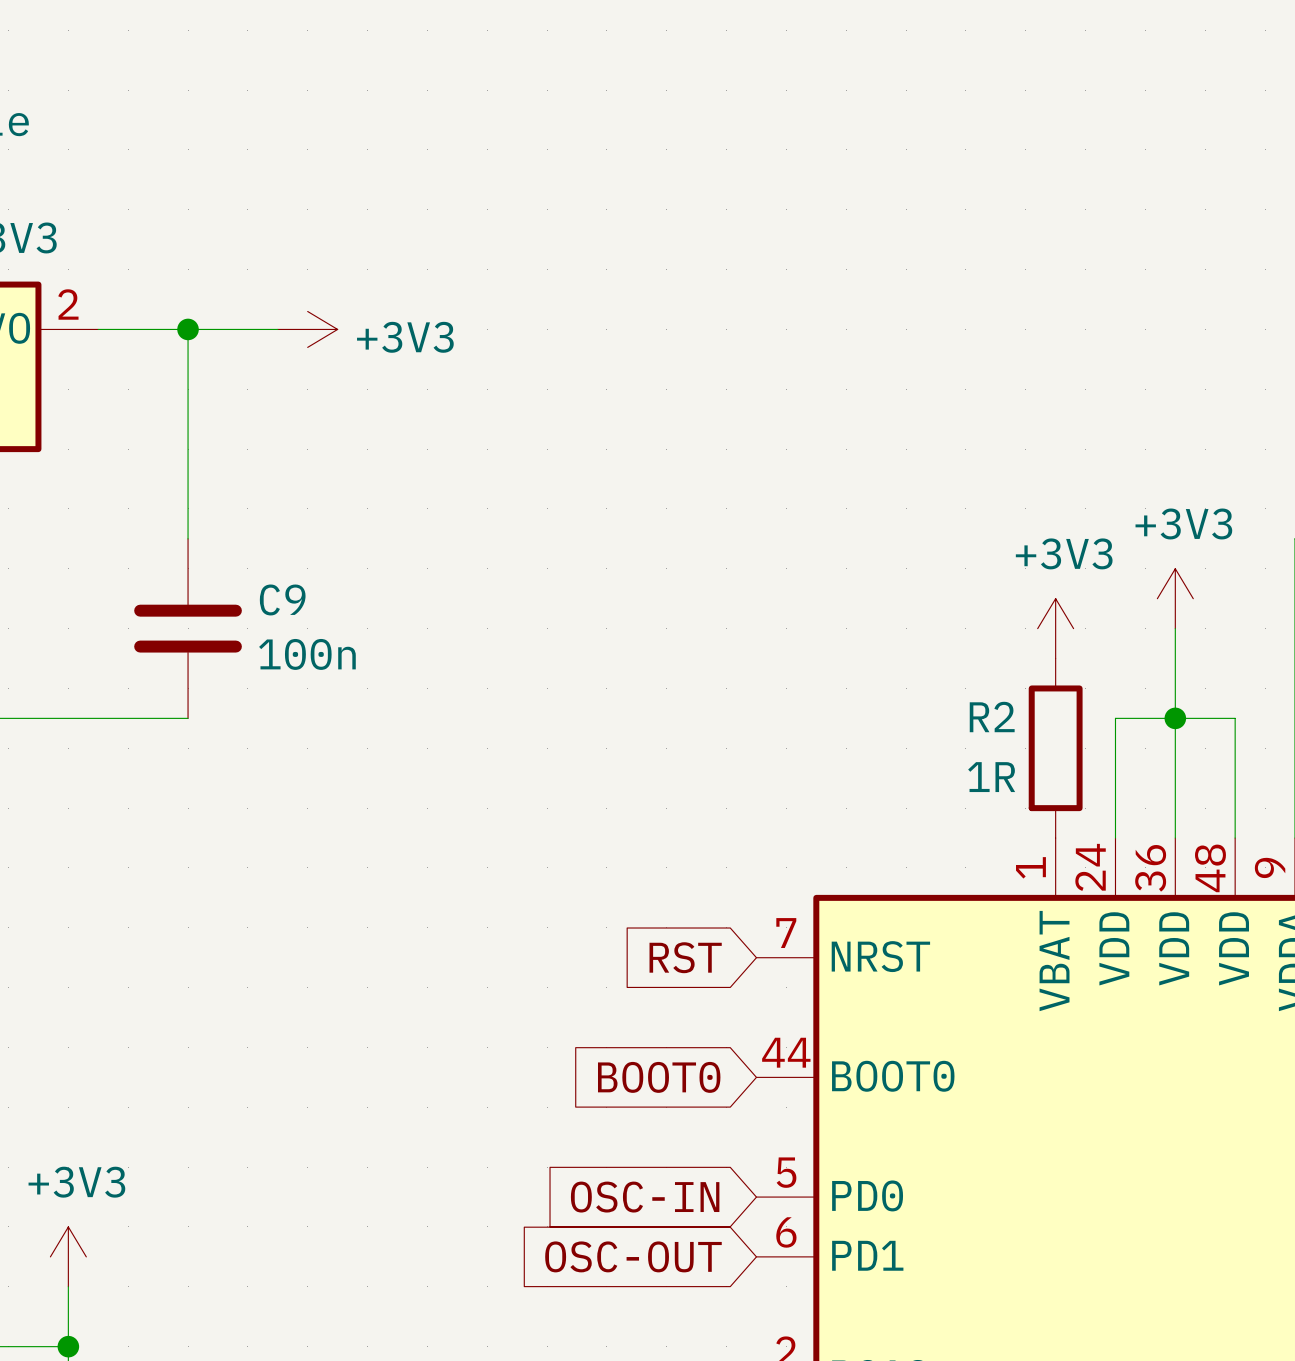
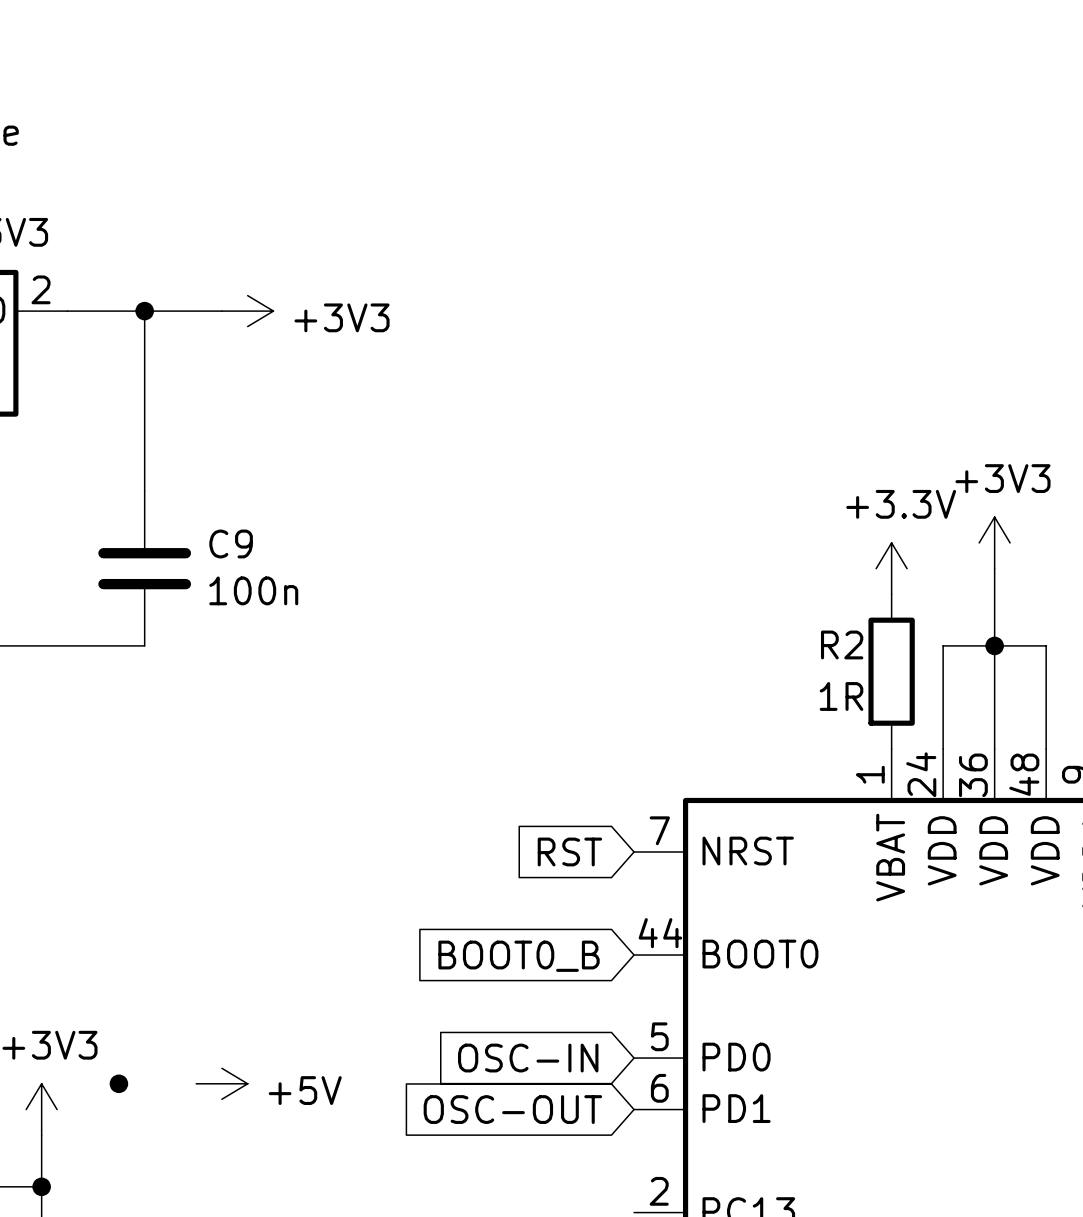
power symbol: +3V3 (1055, 628) -> +3.3V (891, 568)
global label: BOOT0 (659, 1077) -> BOOT0_B (519, 956)
junction: none -> (118, 1083)
power symbol: none -> +5V (221, 1083)

